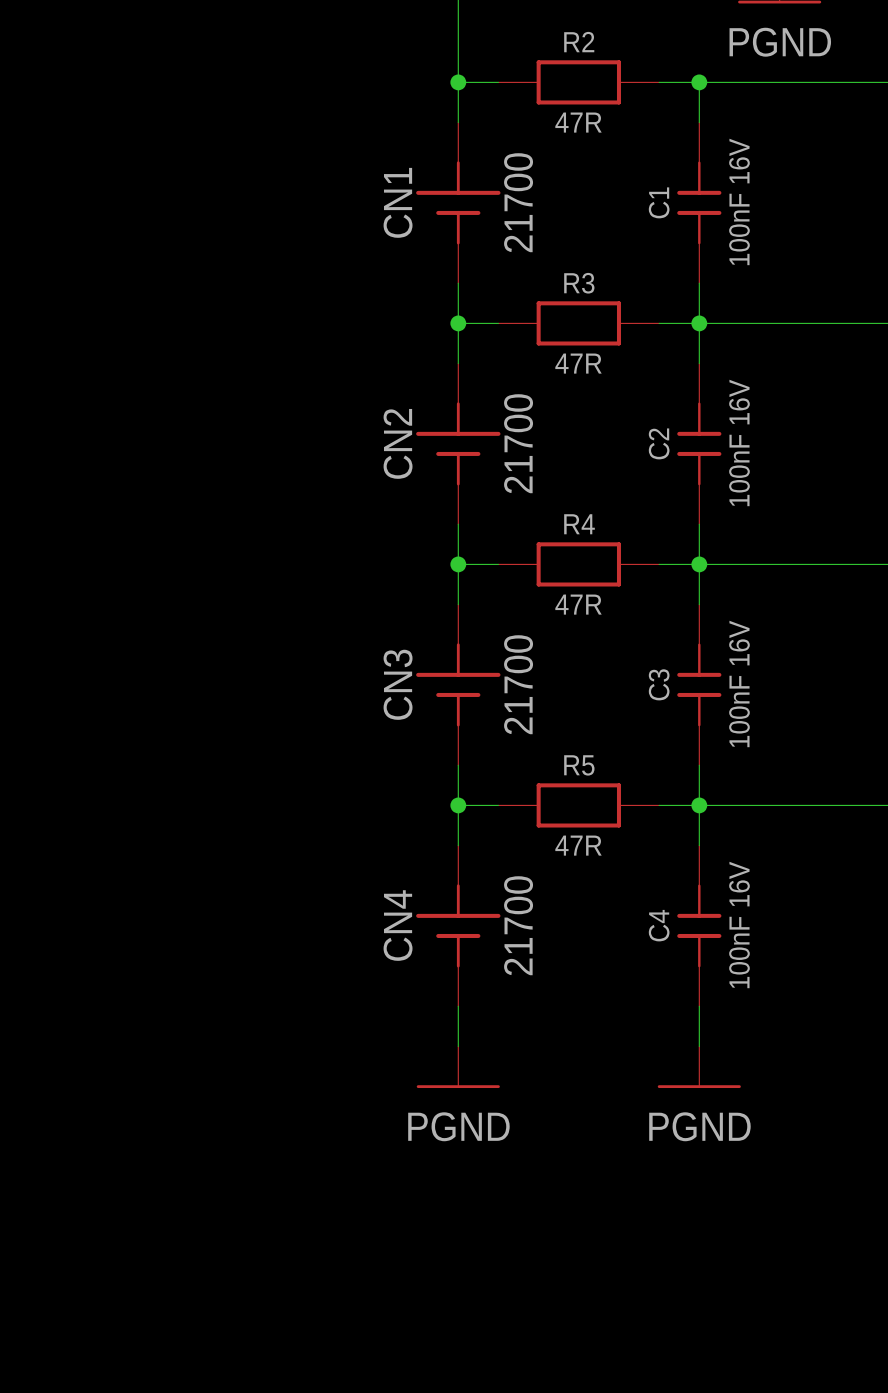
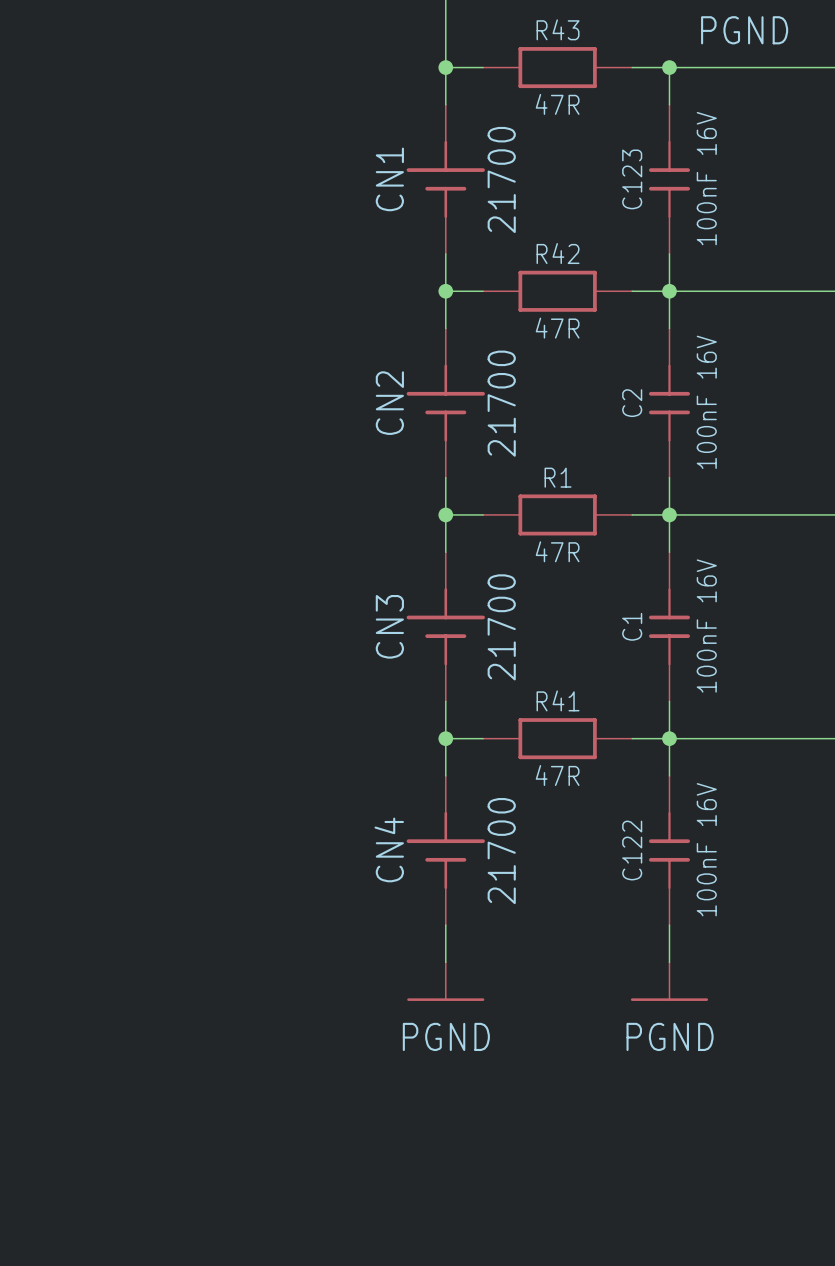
R2 name: R2 (579, 42) -> R43 (558, 29)
C1 name: C1 (659, 202) -> C123 (632, 179)
R3 name: R3 (579, 283) -> R42 (558, 253)
R4 name: R4 (579, 524) -> R1 (558, 477)
C3 name: C3 (659, 684) -> C1 (632, 626)
R5 name: R5 (579, 765) -> R41 (558, 700)
C4 name: C4 (659, 925) -> C122 (632, 850)

